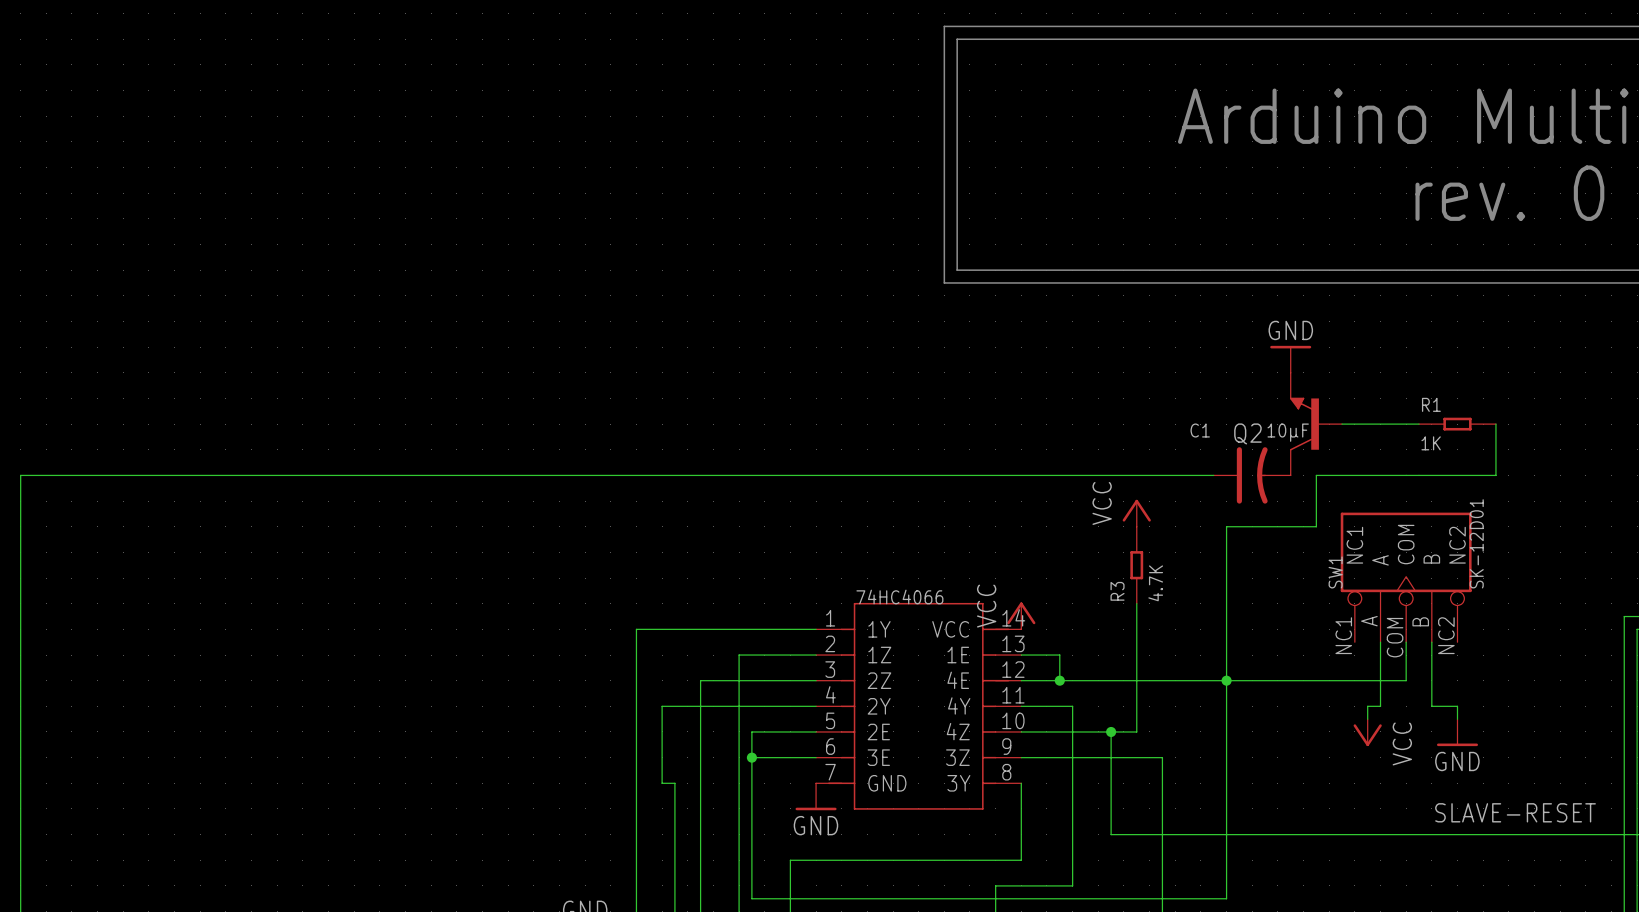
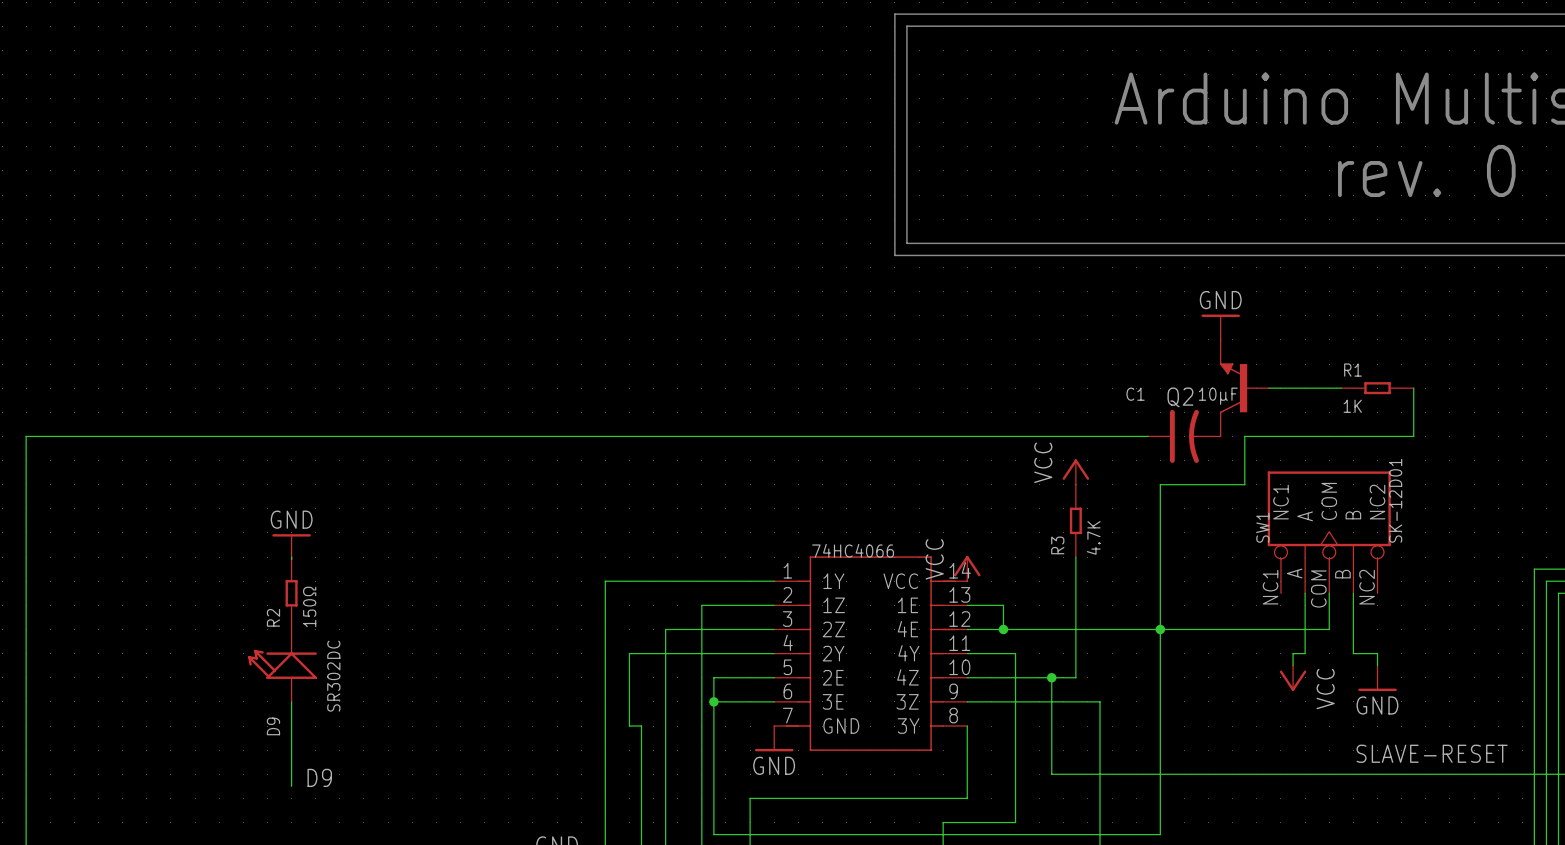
power symbol: none -> GND (291, 546)
wire: none -> (291, 557) (291, 559)
R2: none -> 150Ω (291, 593)
D9: none -> SR302DC (282, 665)
wire: none -> (291, 701) (291, 786)
text: none -> D9 (319, 777)

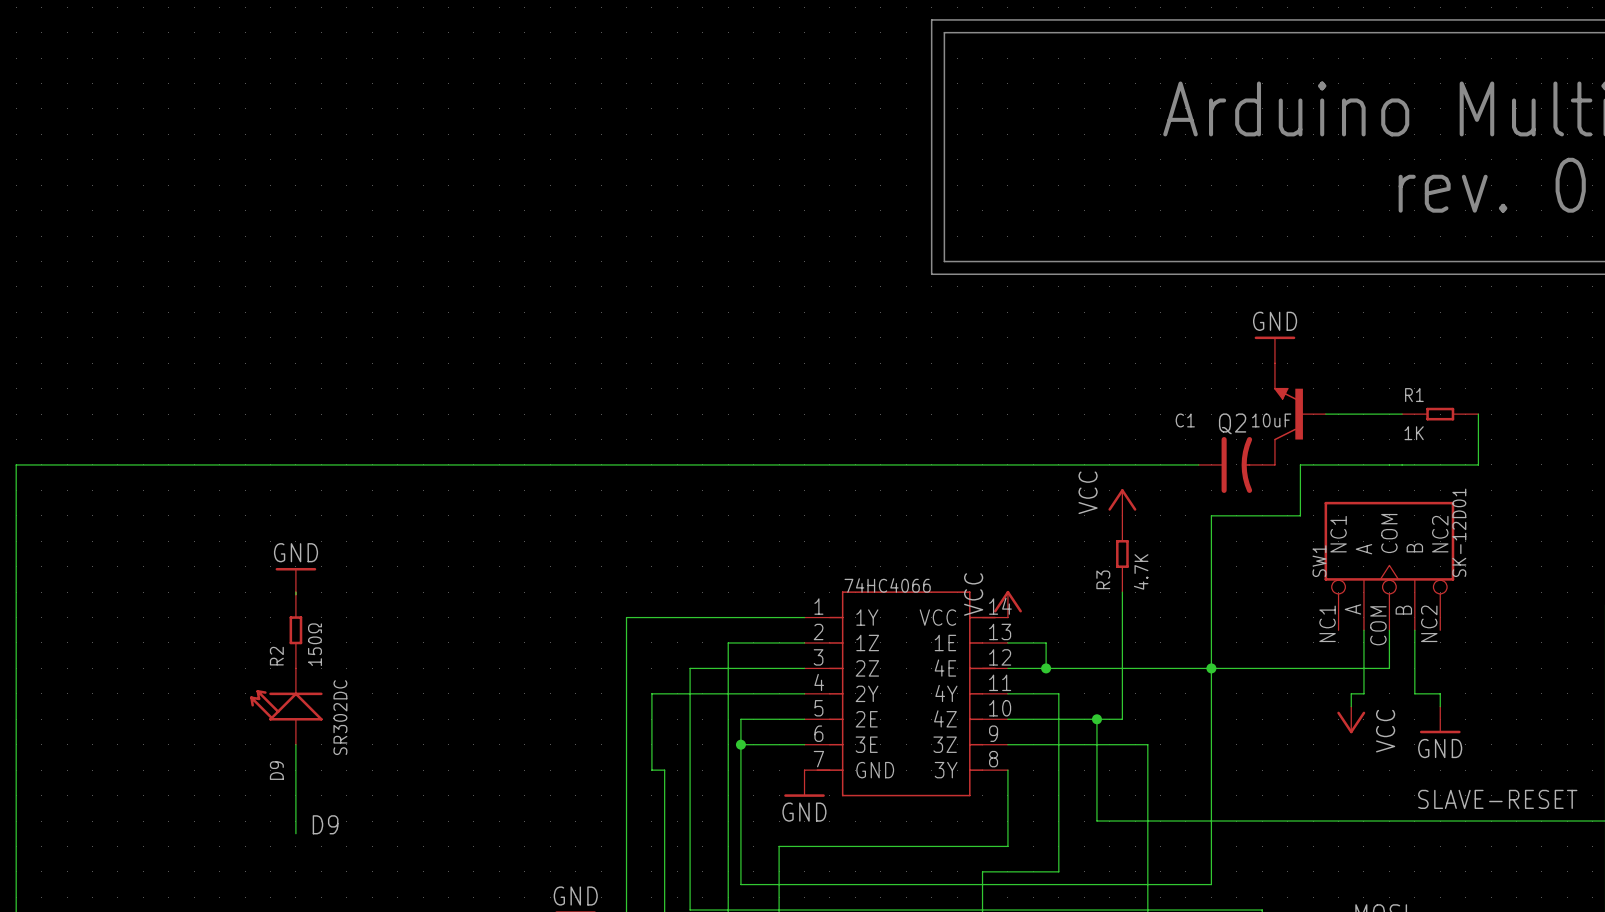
C1 value: 10µF (1218, 396) -> 10uF (1271, 420)

